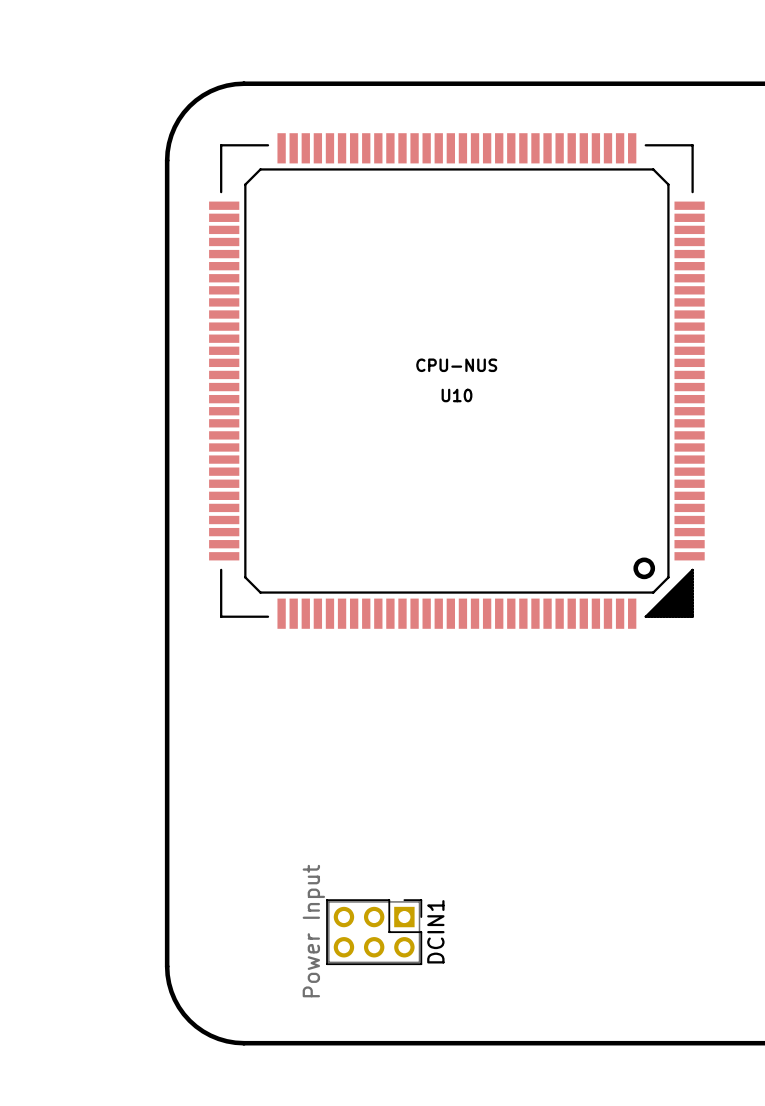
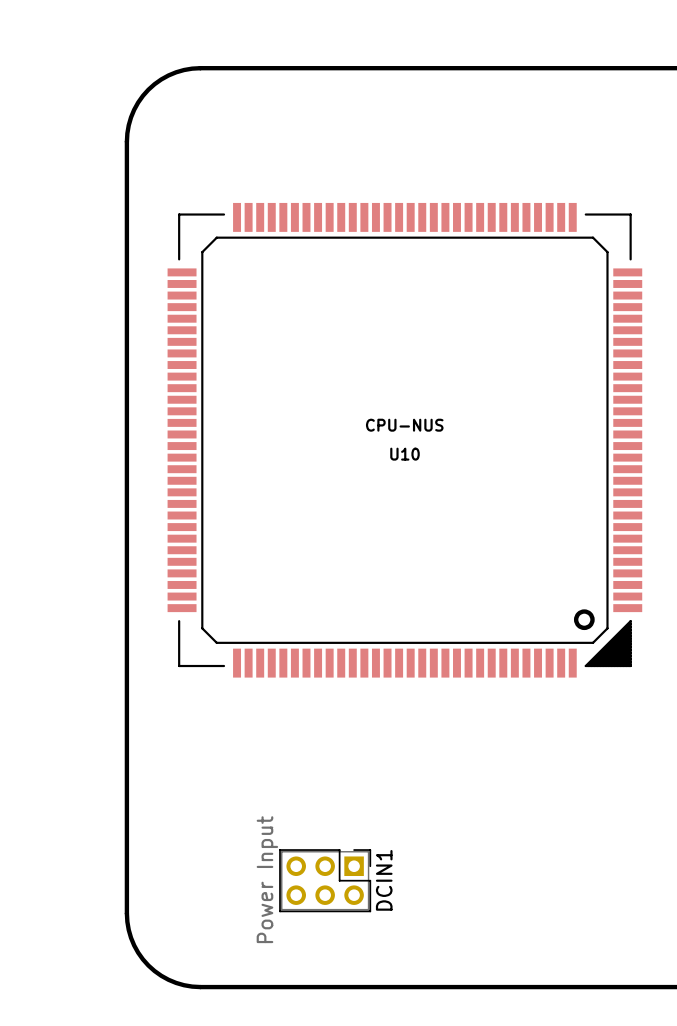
U10 position: (456, 381) -> (404, 440)

